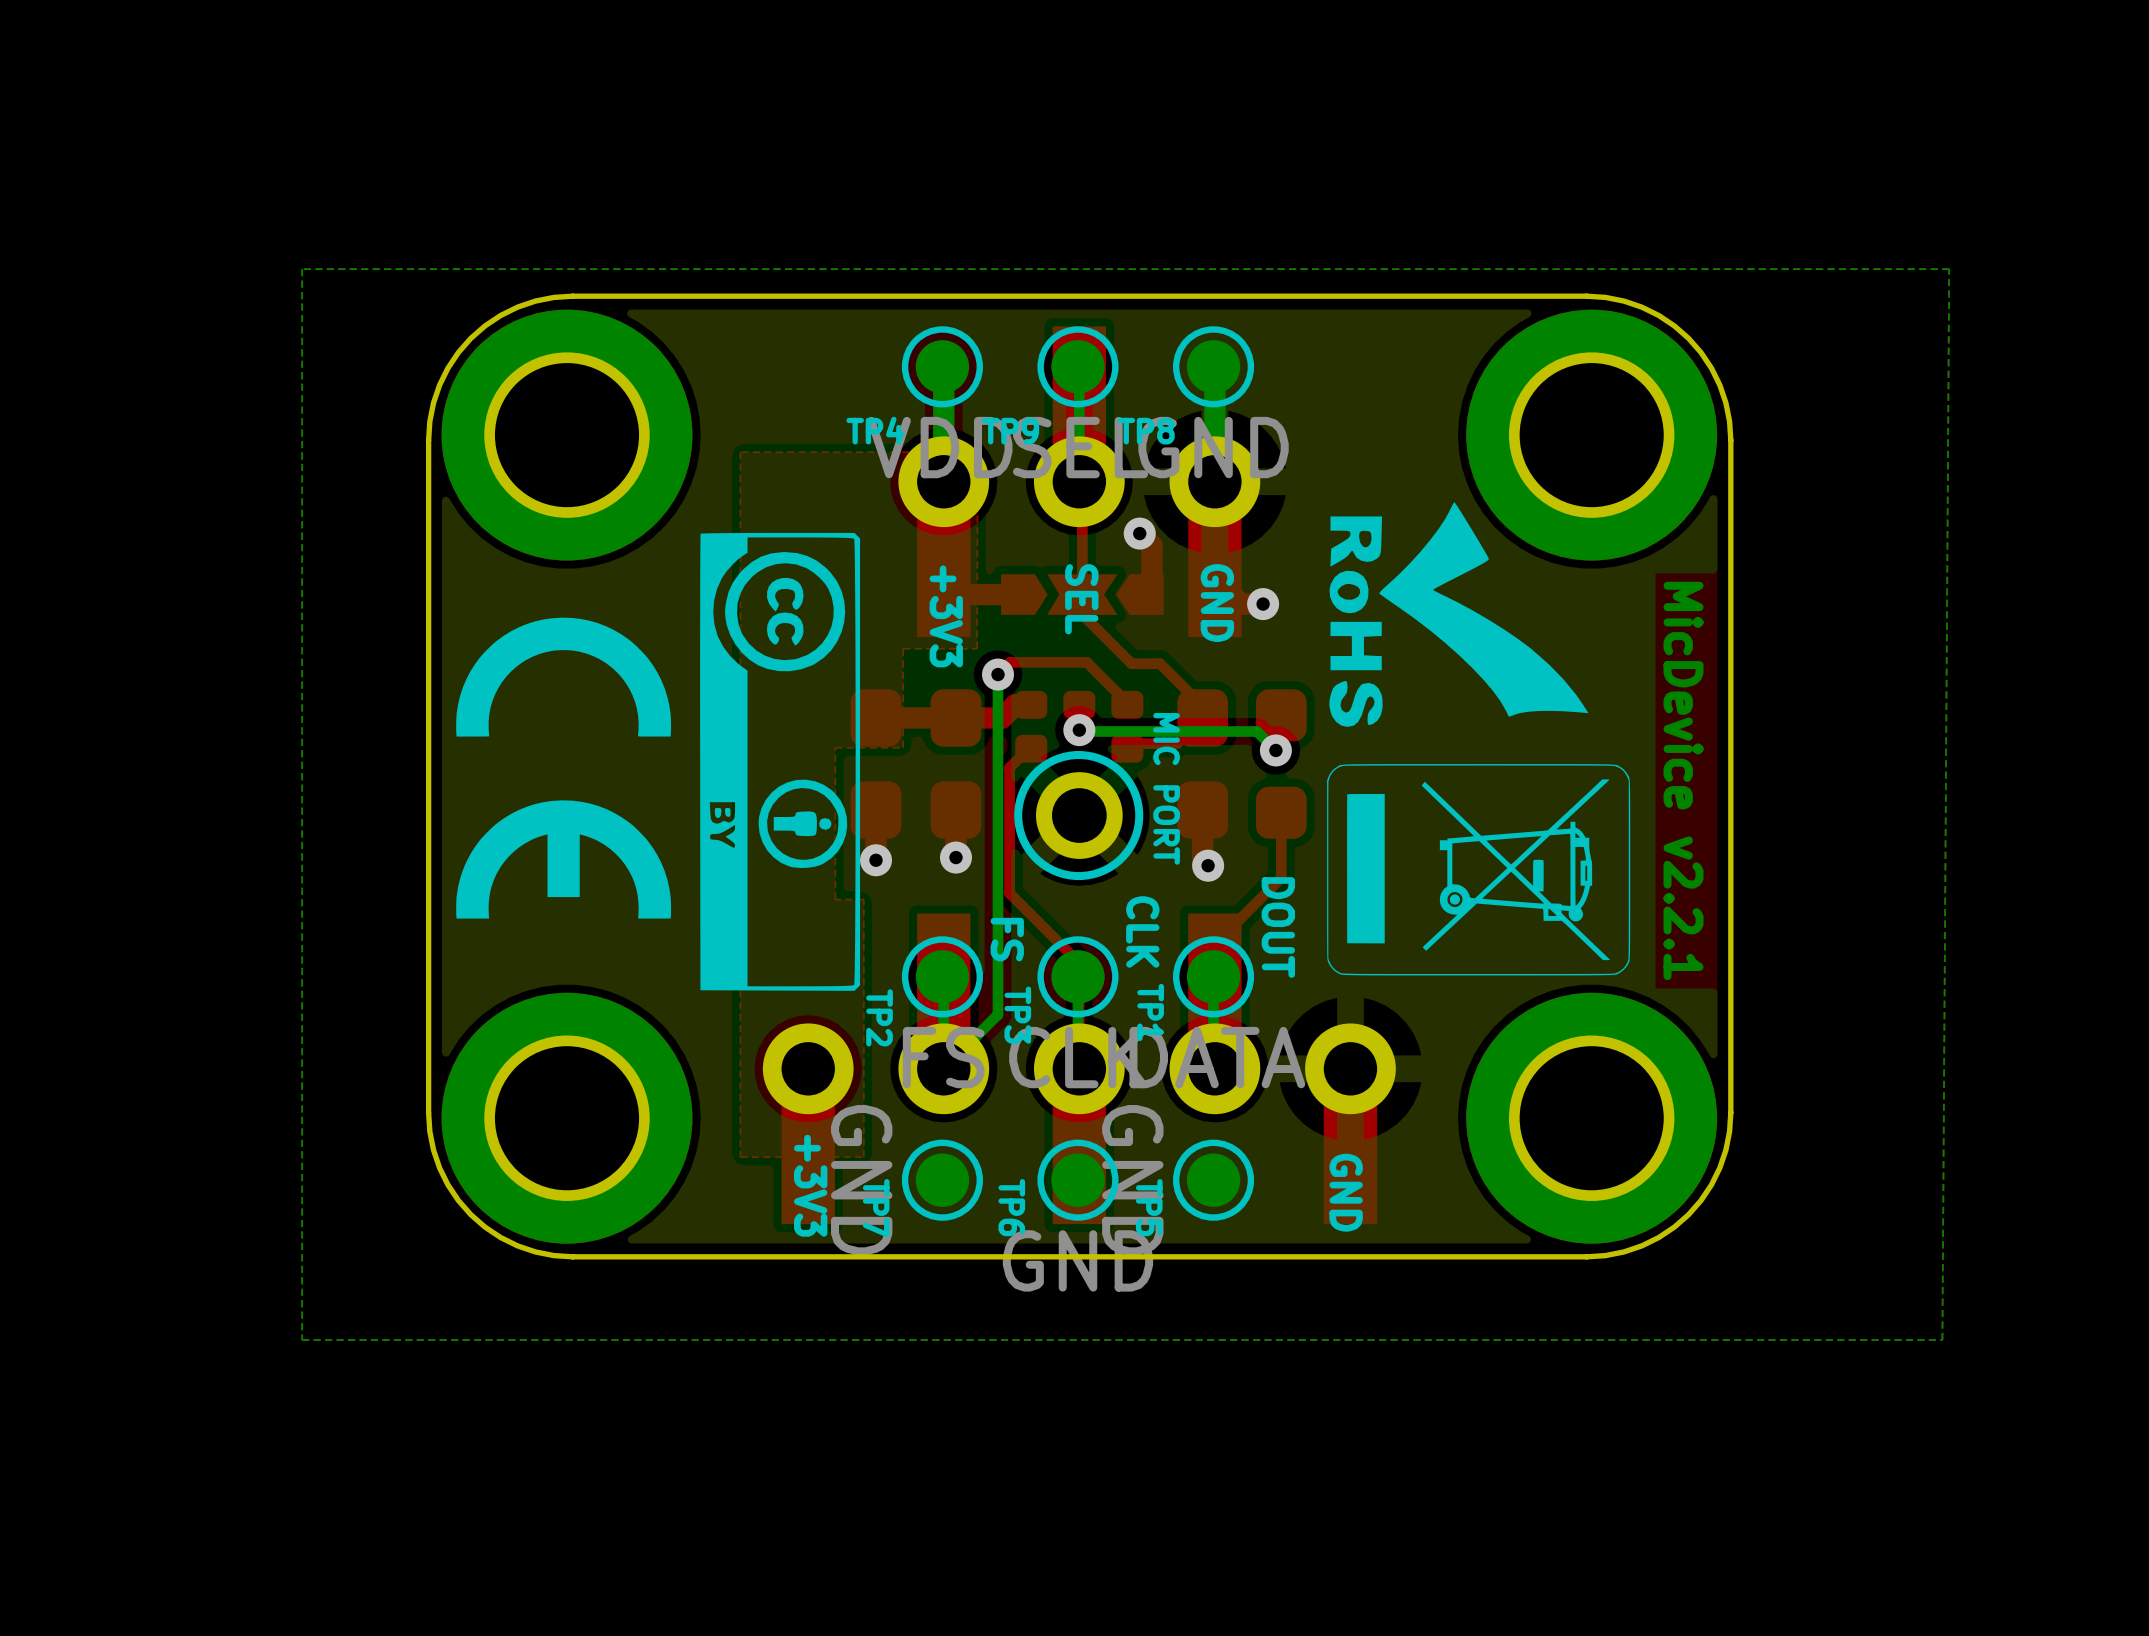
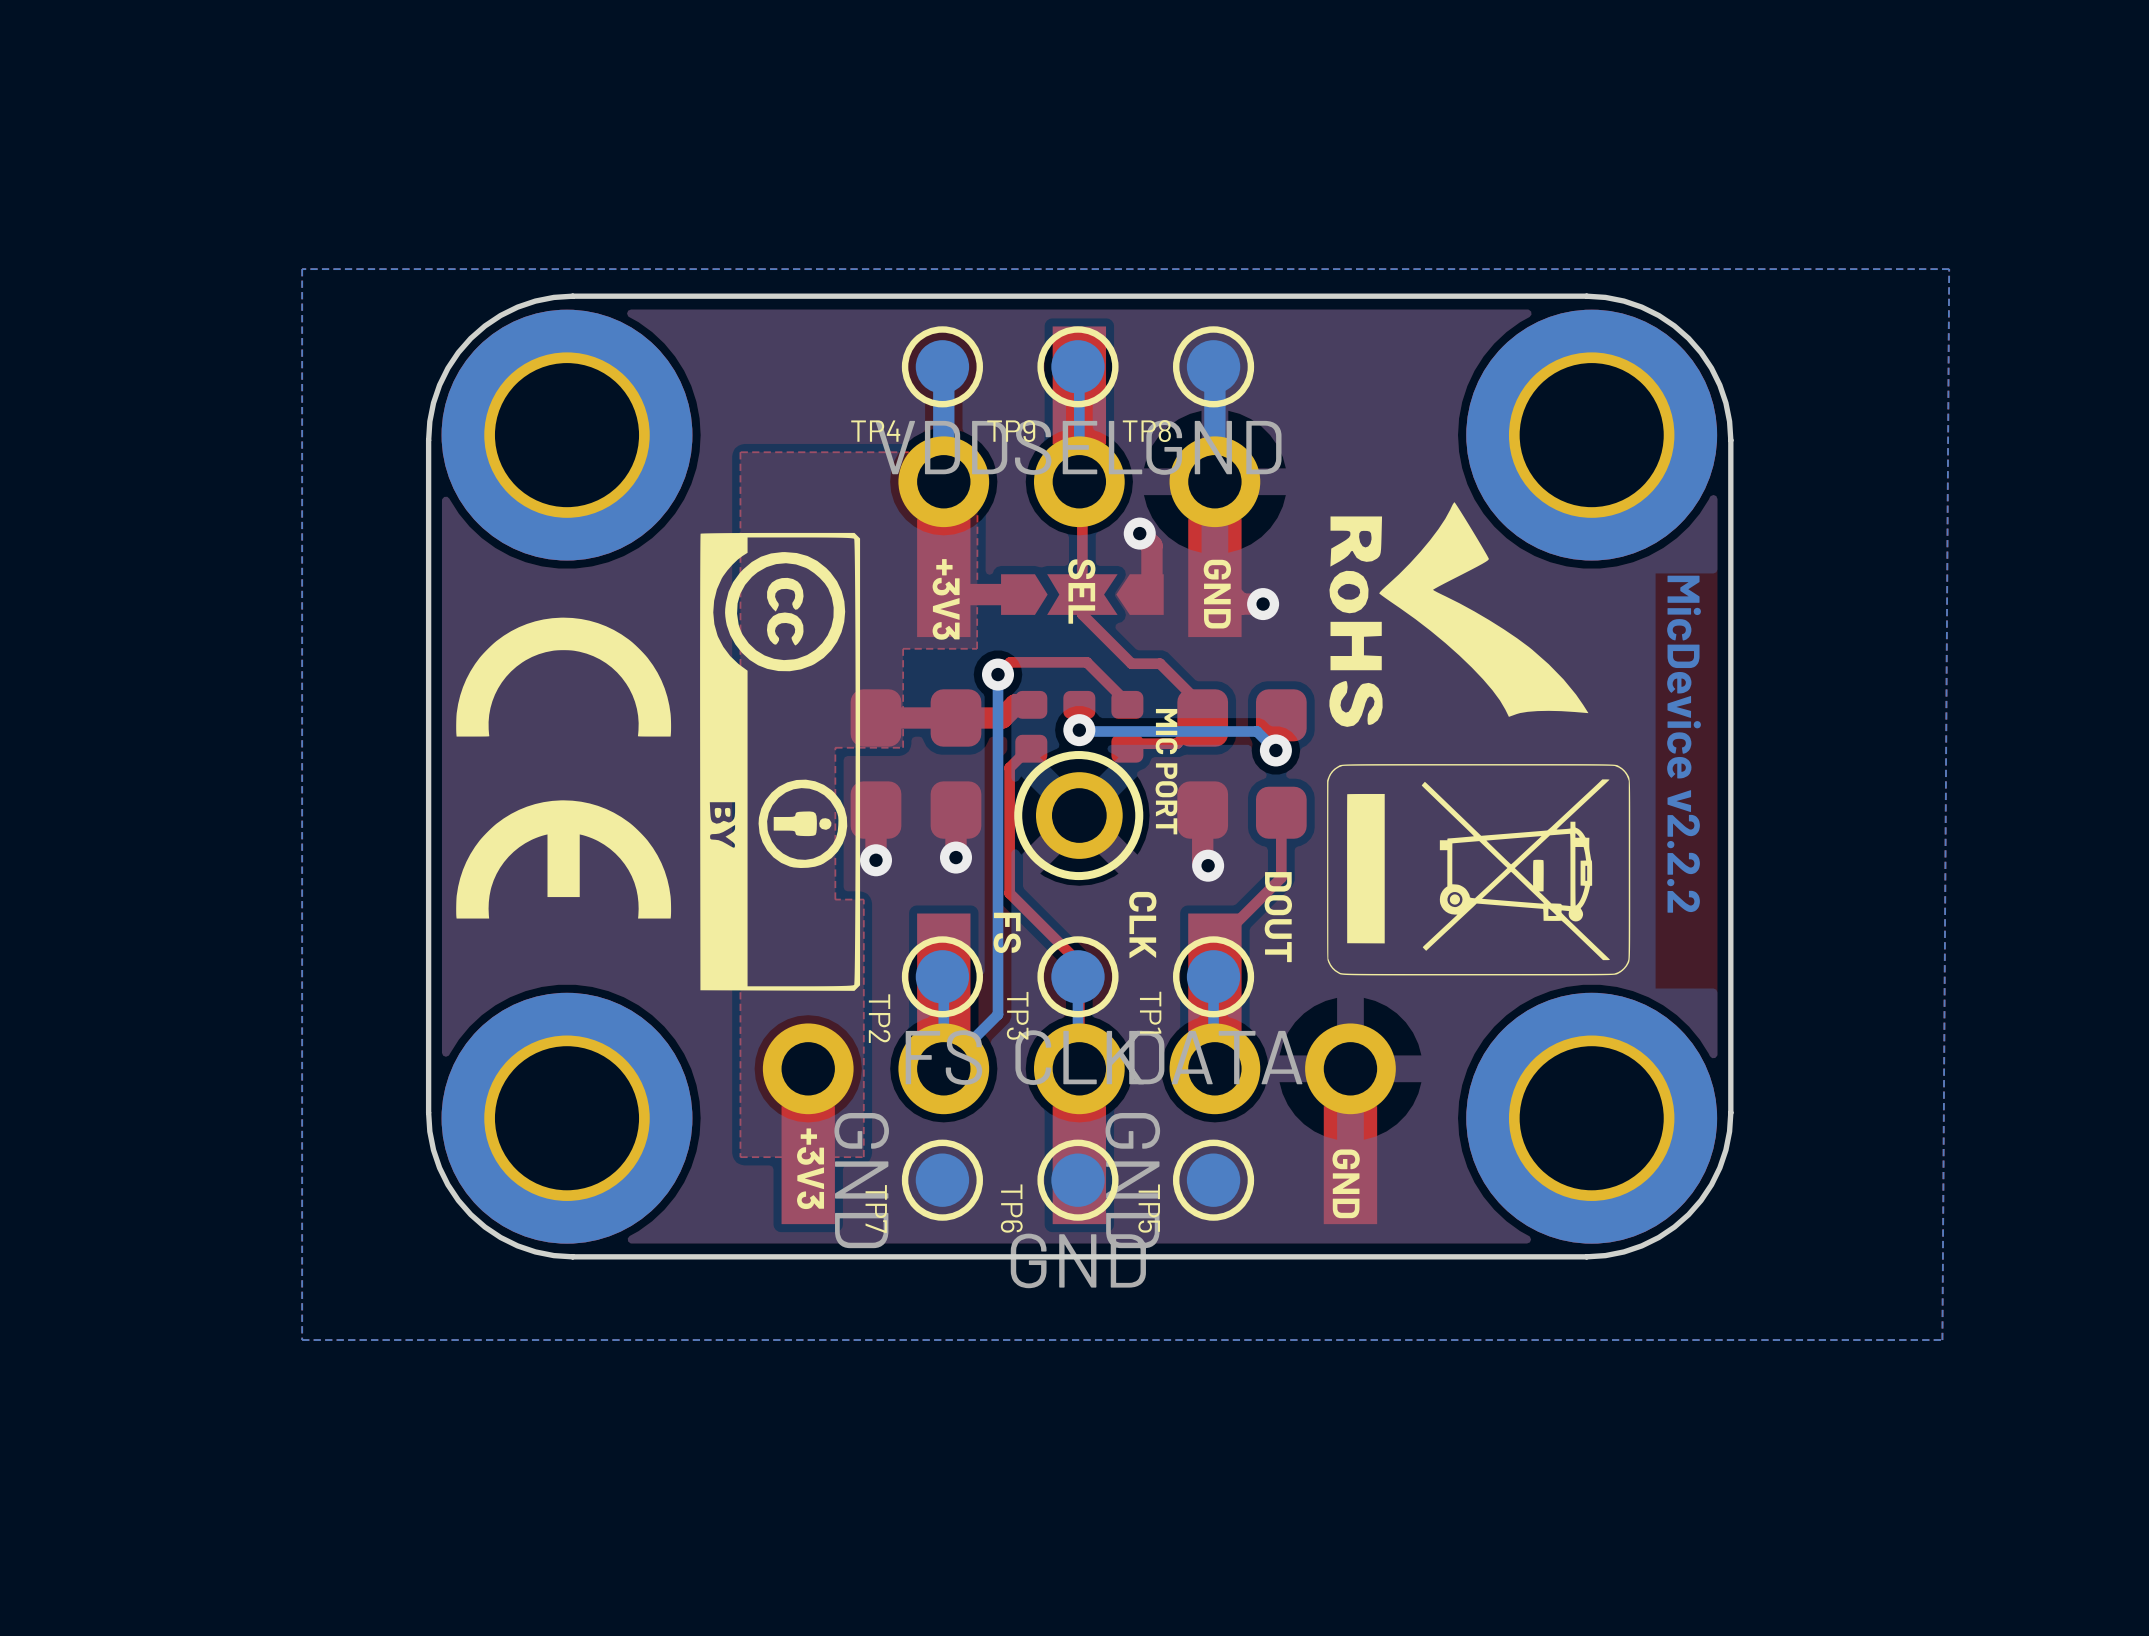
text: MicDevice v2.2.1 (1683, 780) -> MicDevice v2.2.2 (1684, 744)

